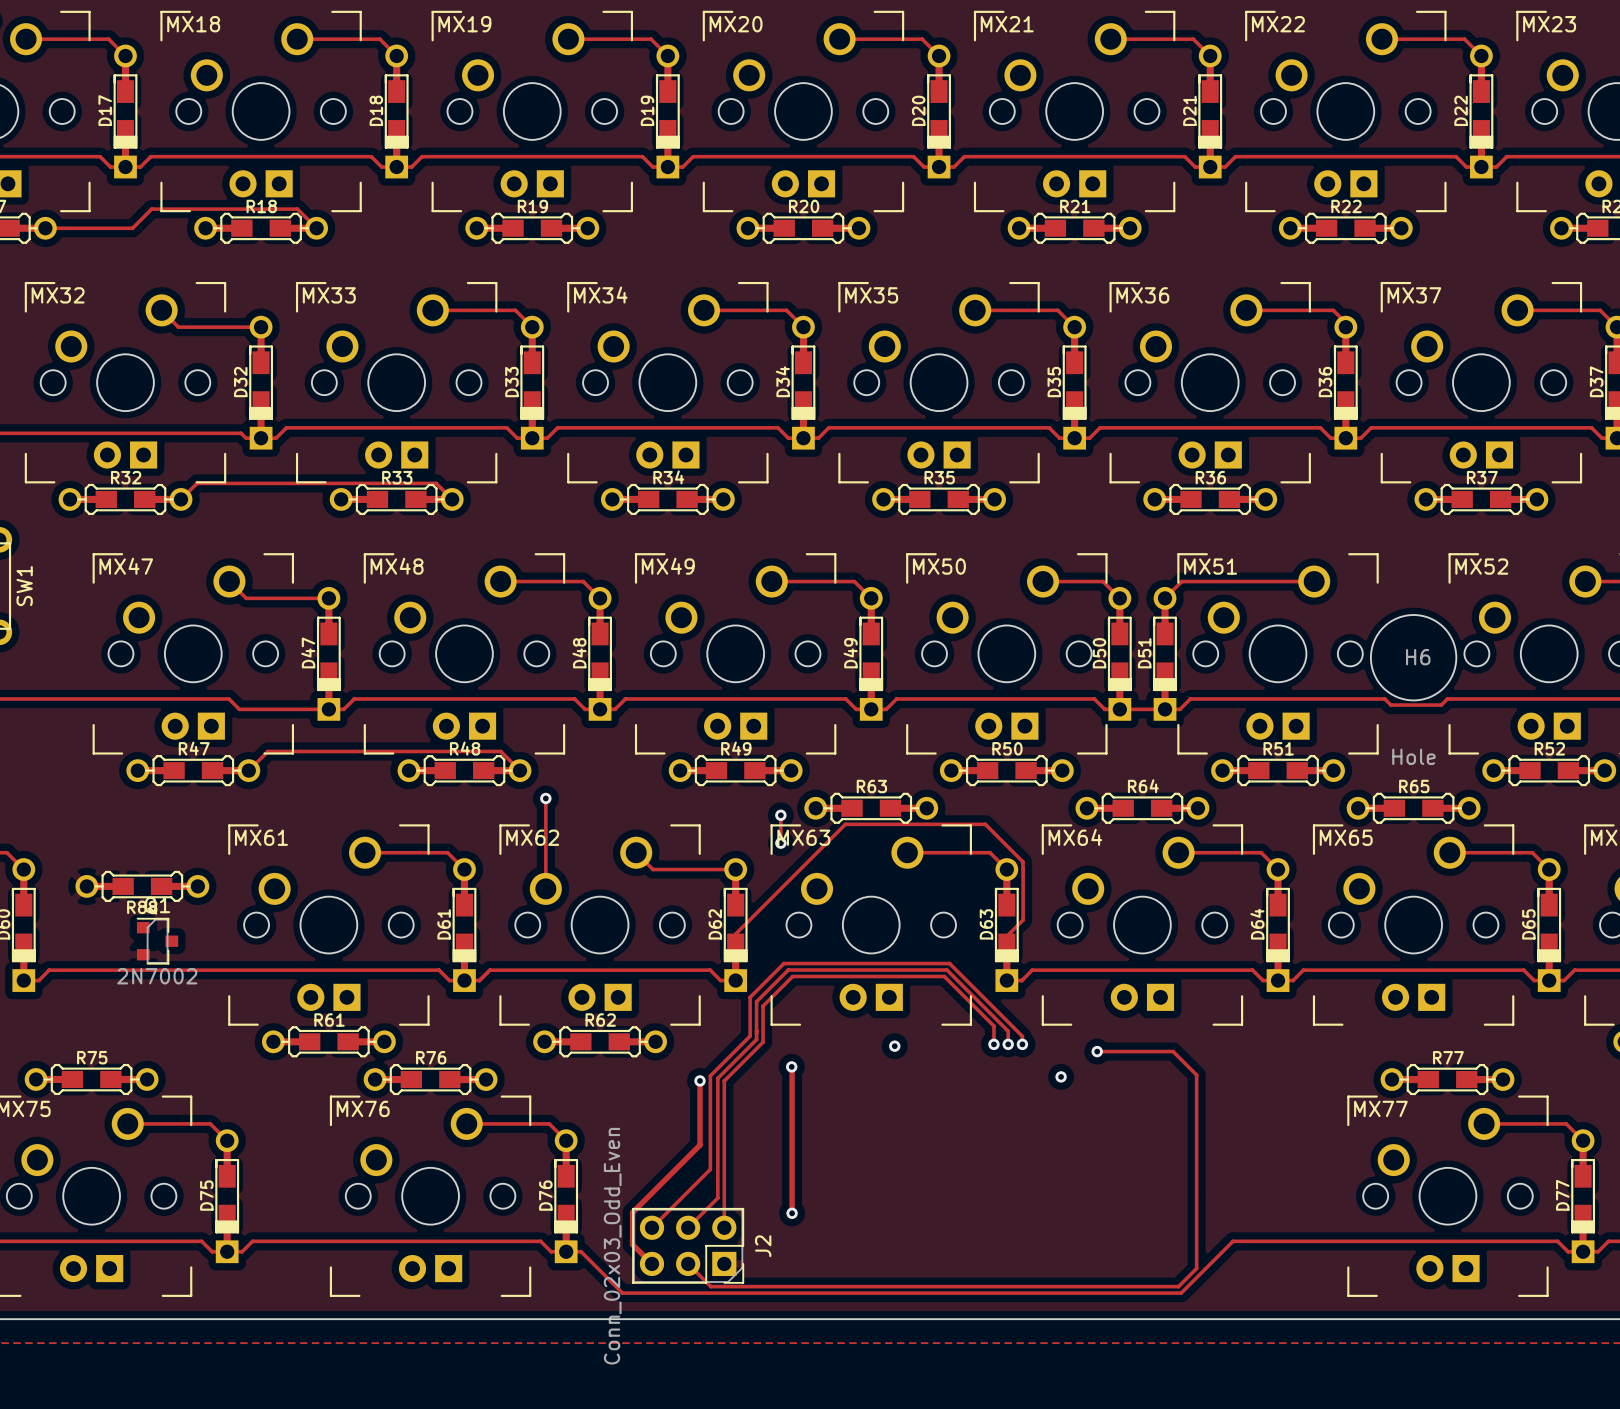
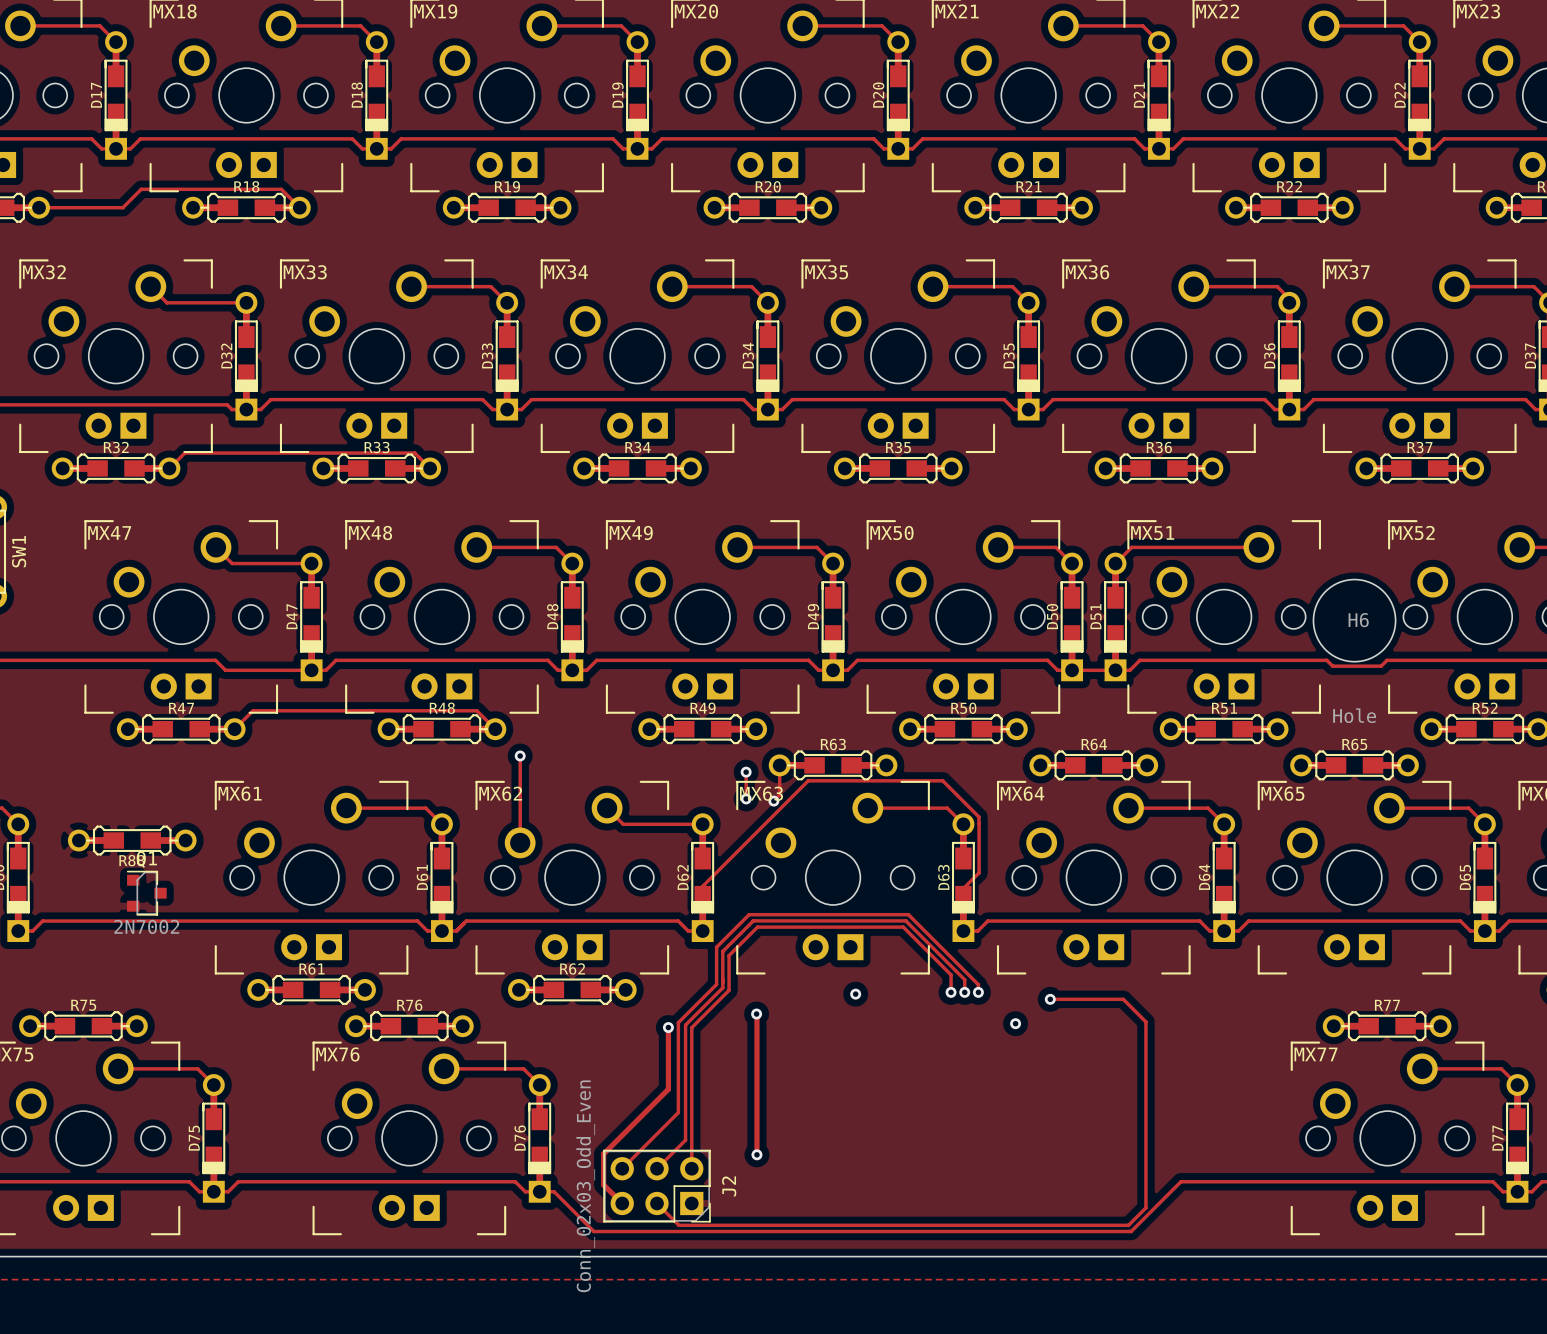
track: none -> (779, 765) (779, 795) (773, 801)
via: none -> (773, 801)

